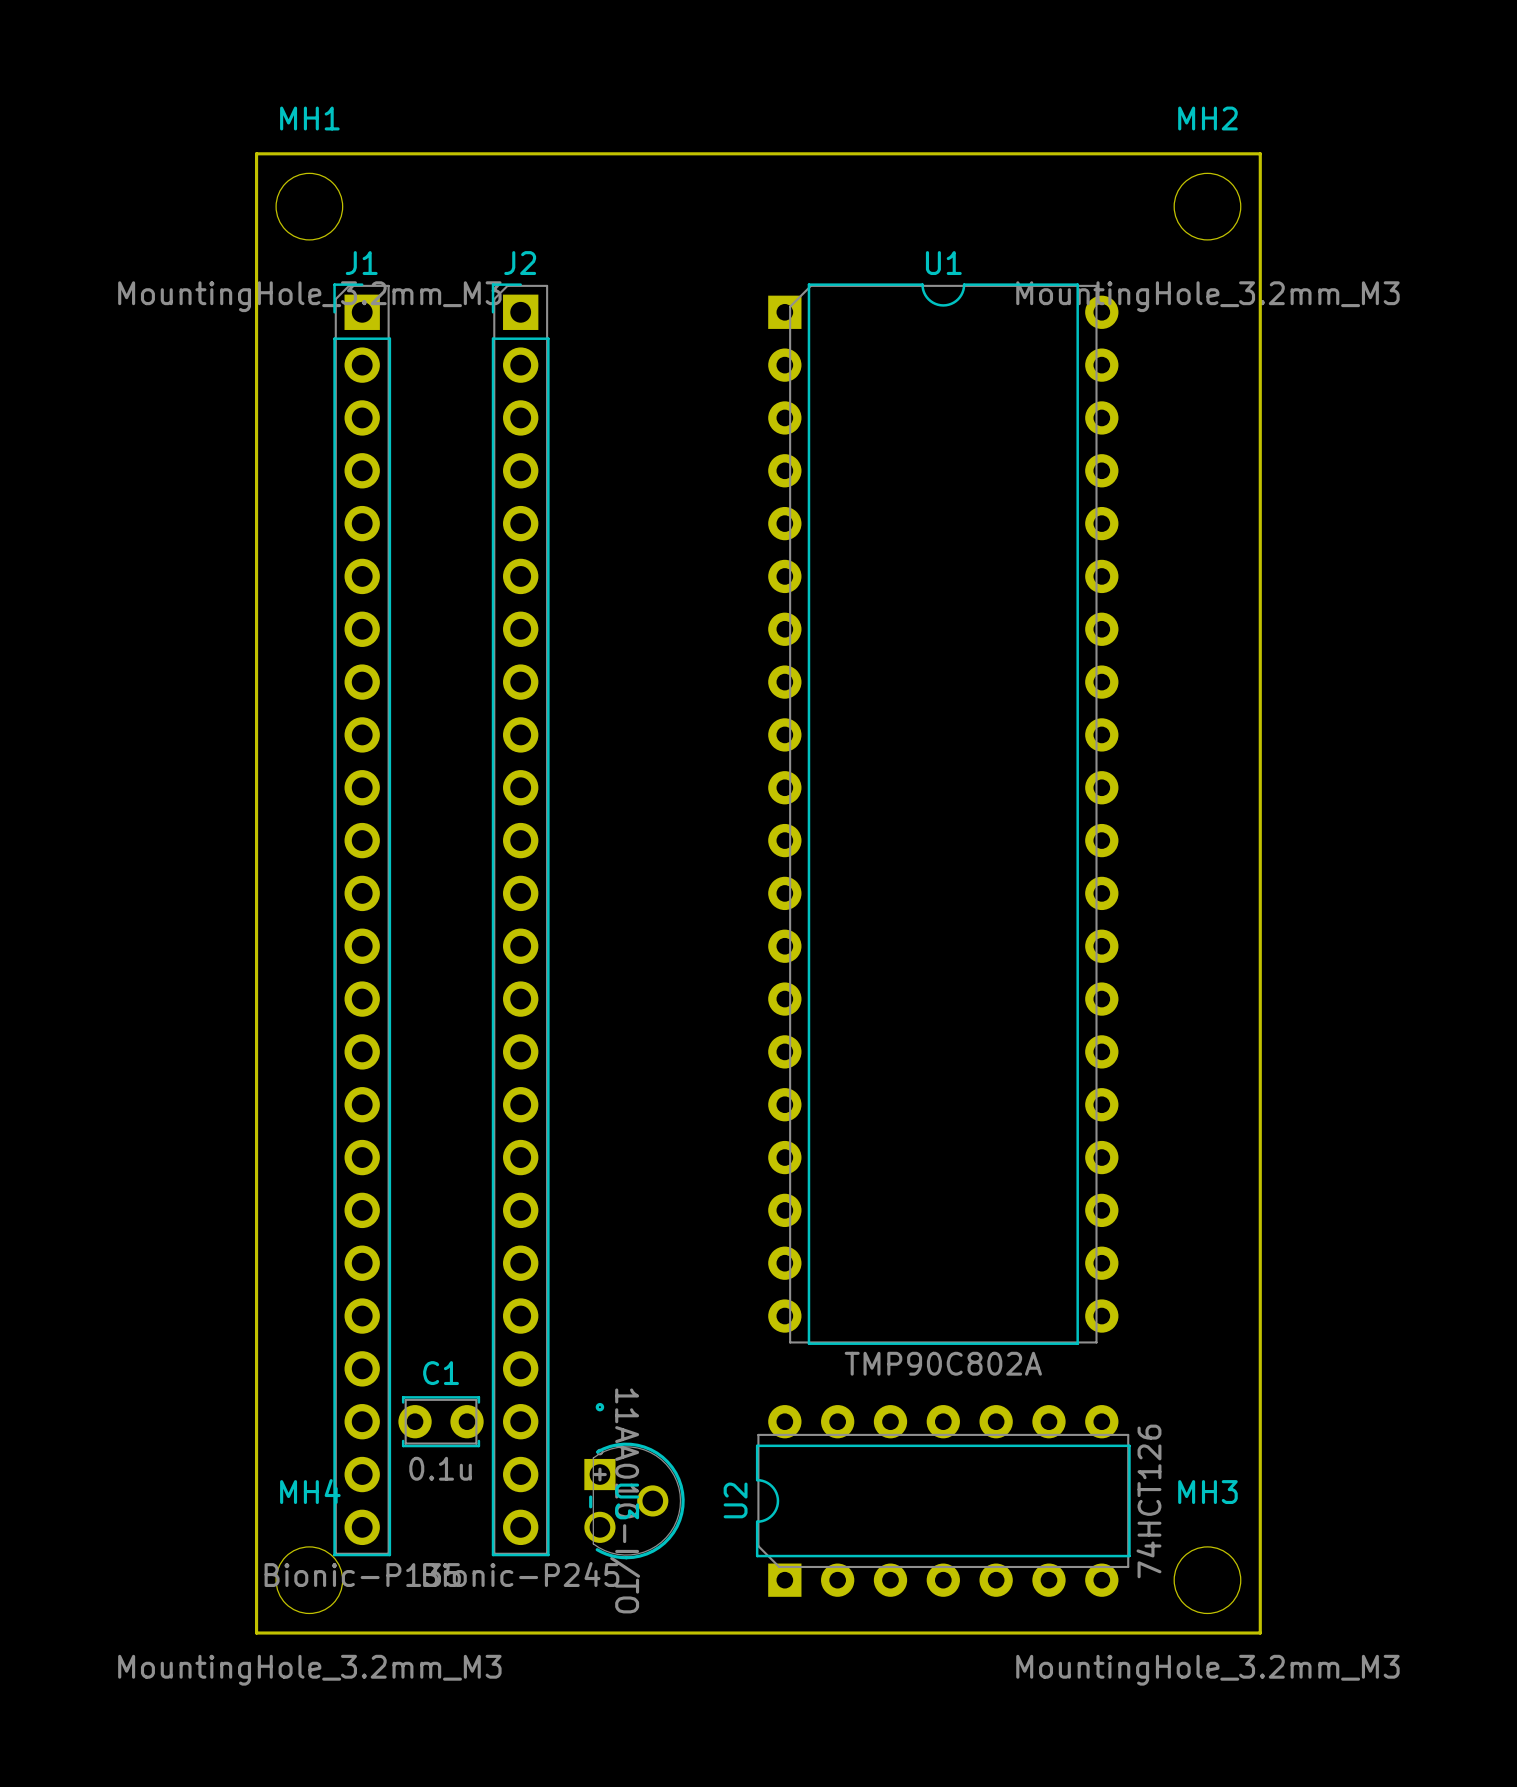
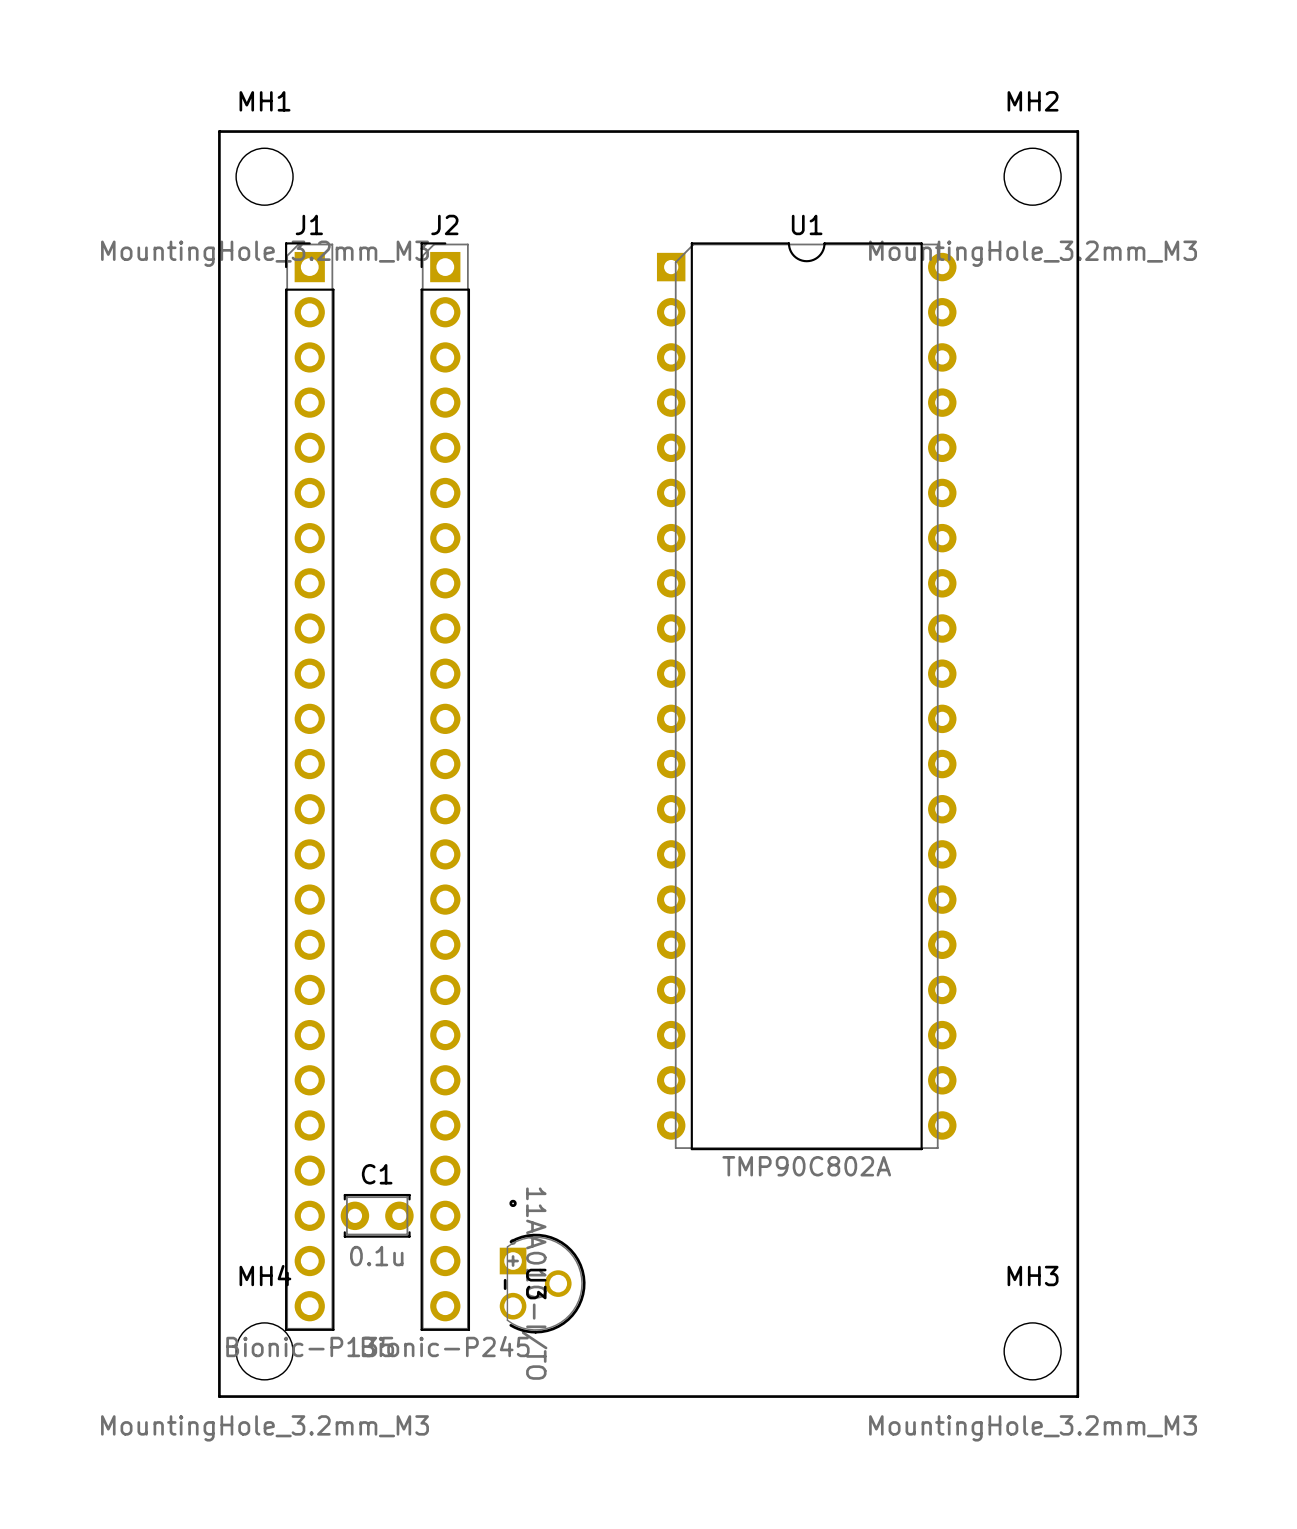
U2: 74HCT126 (943, 1500) -> none

